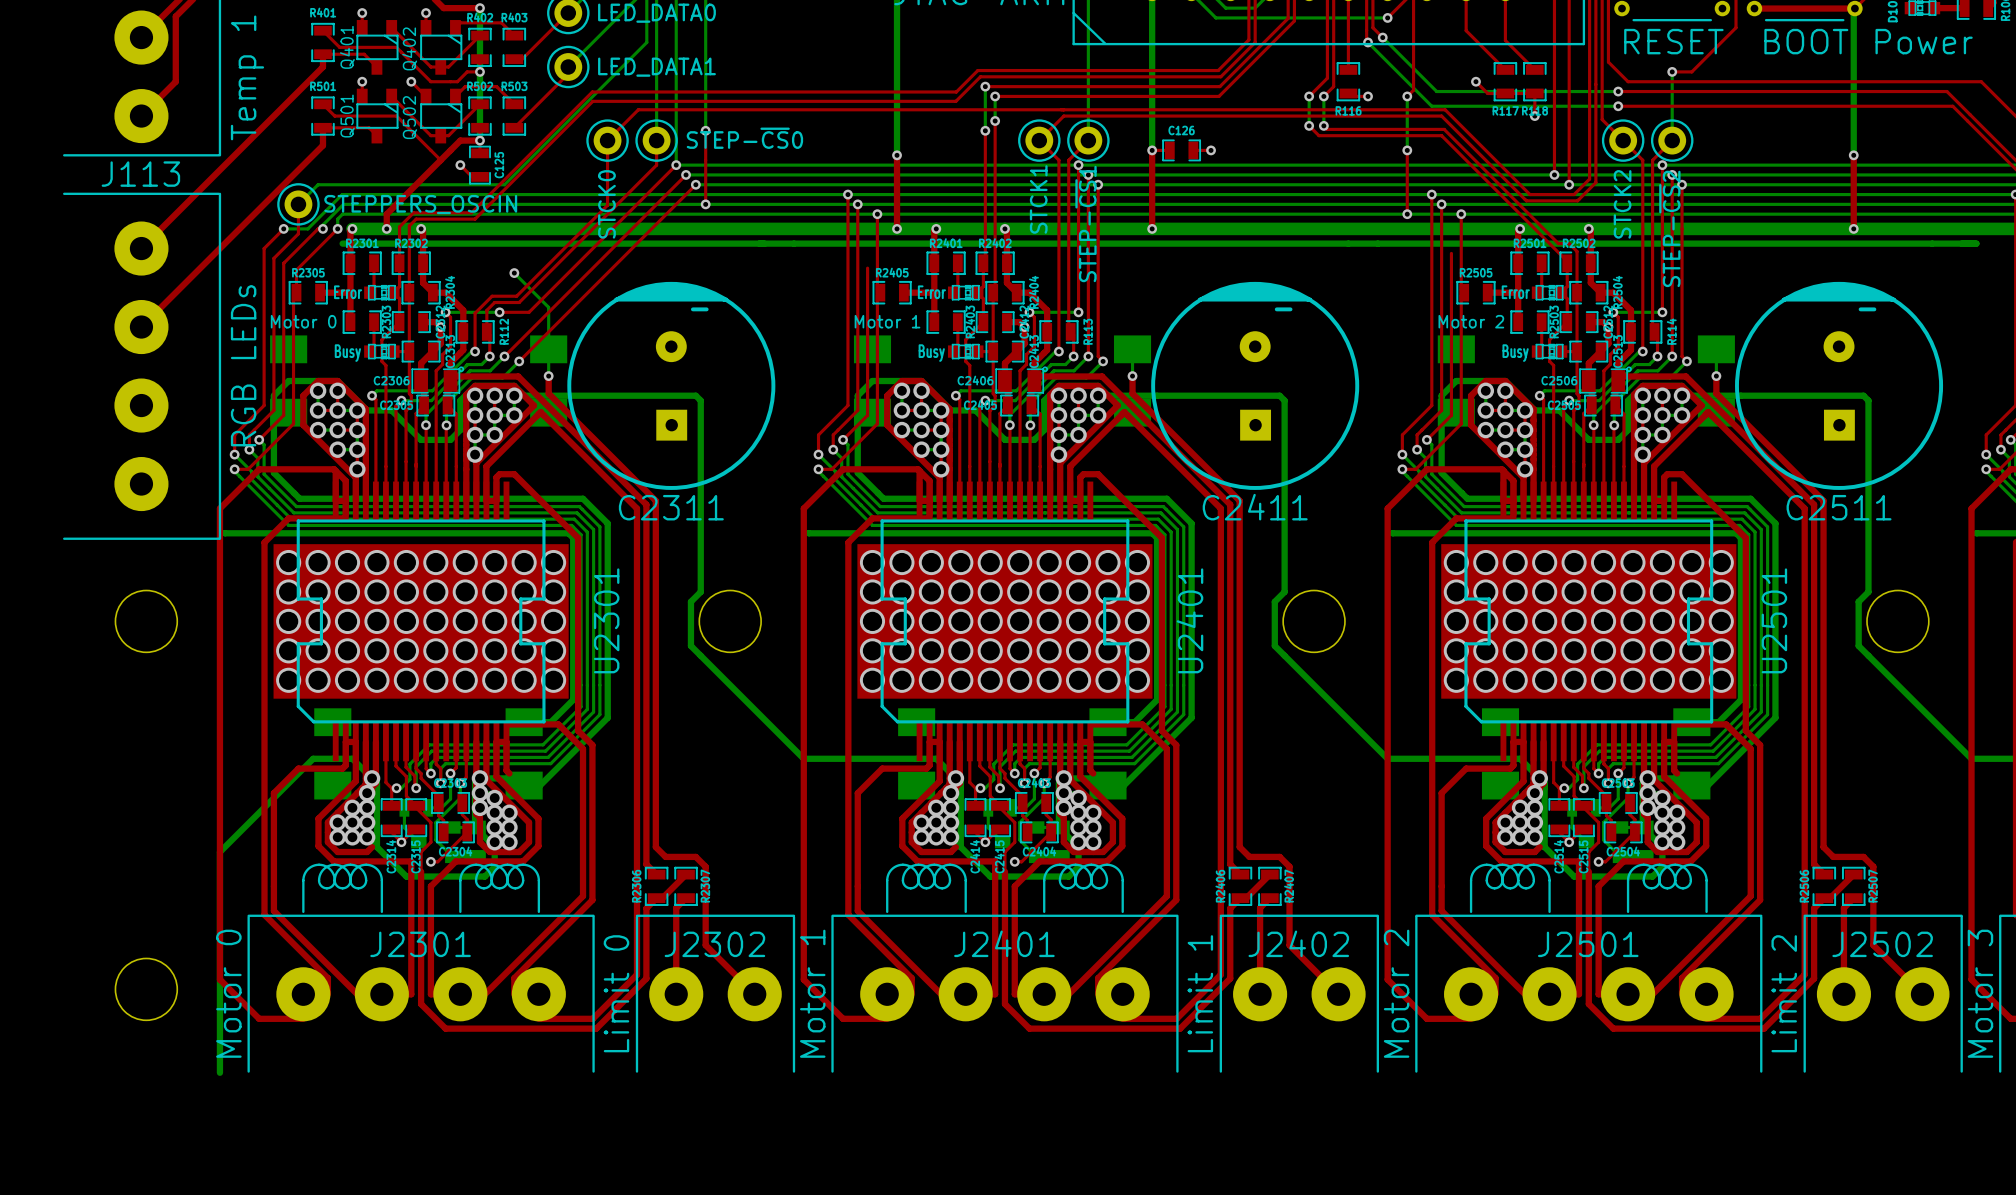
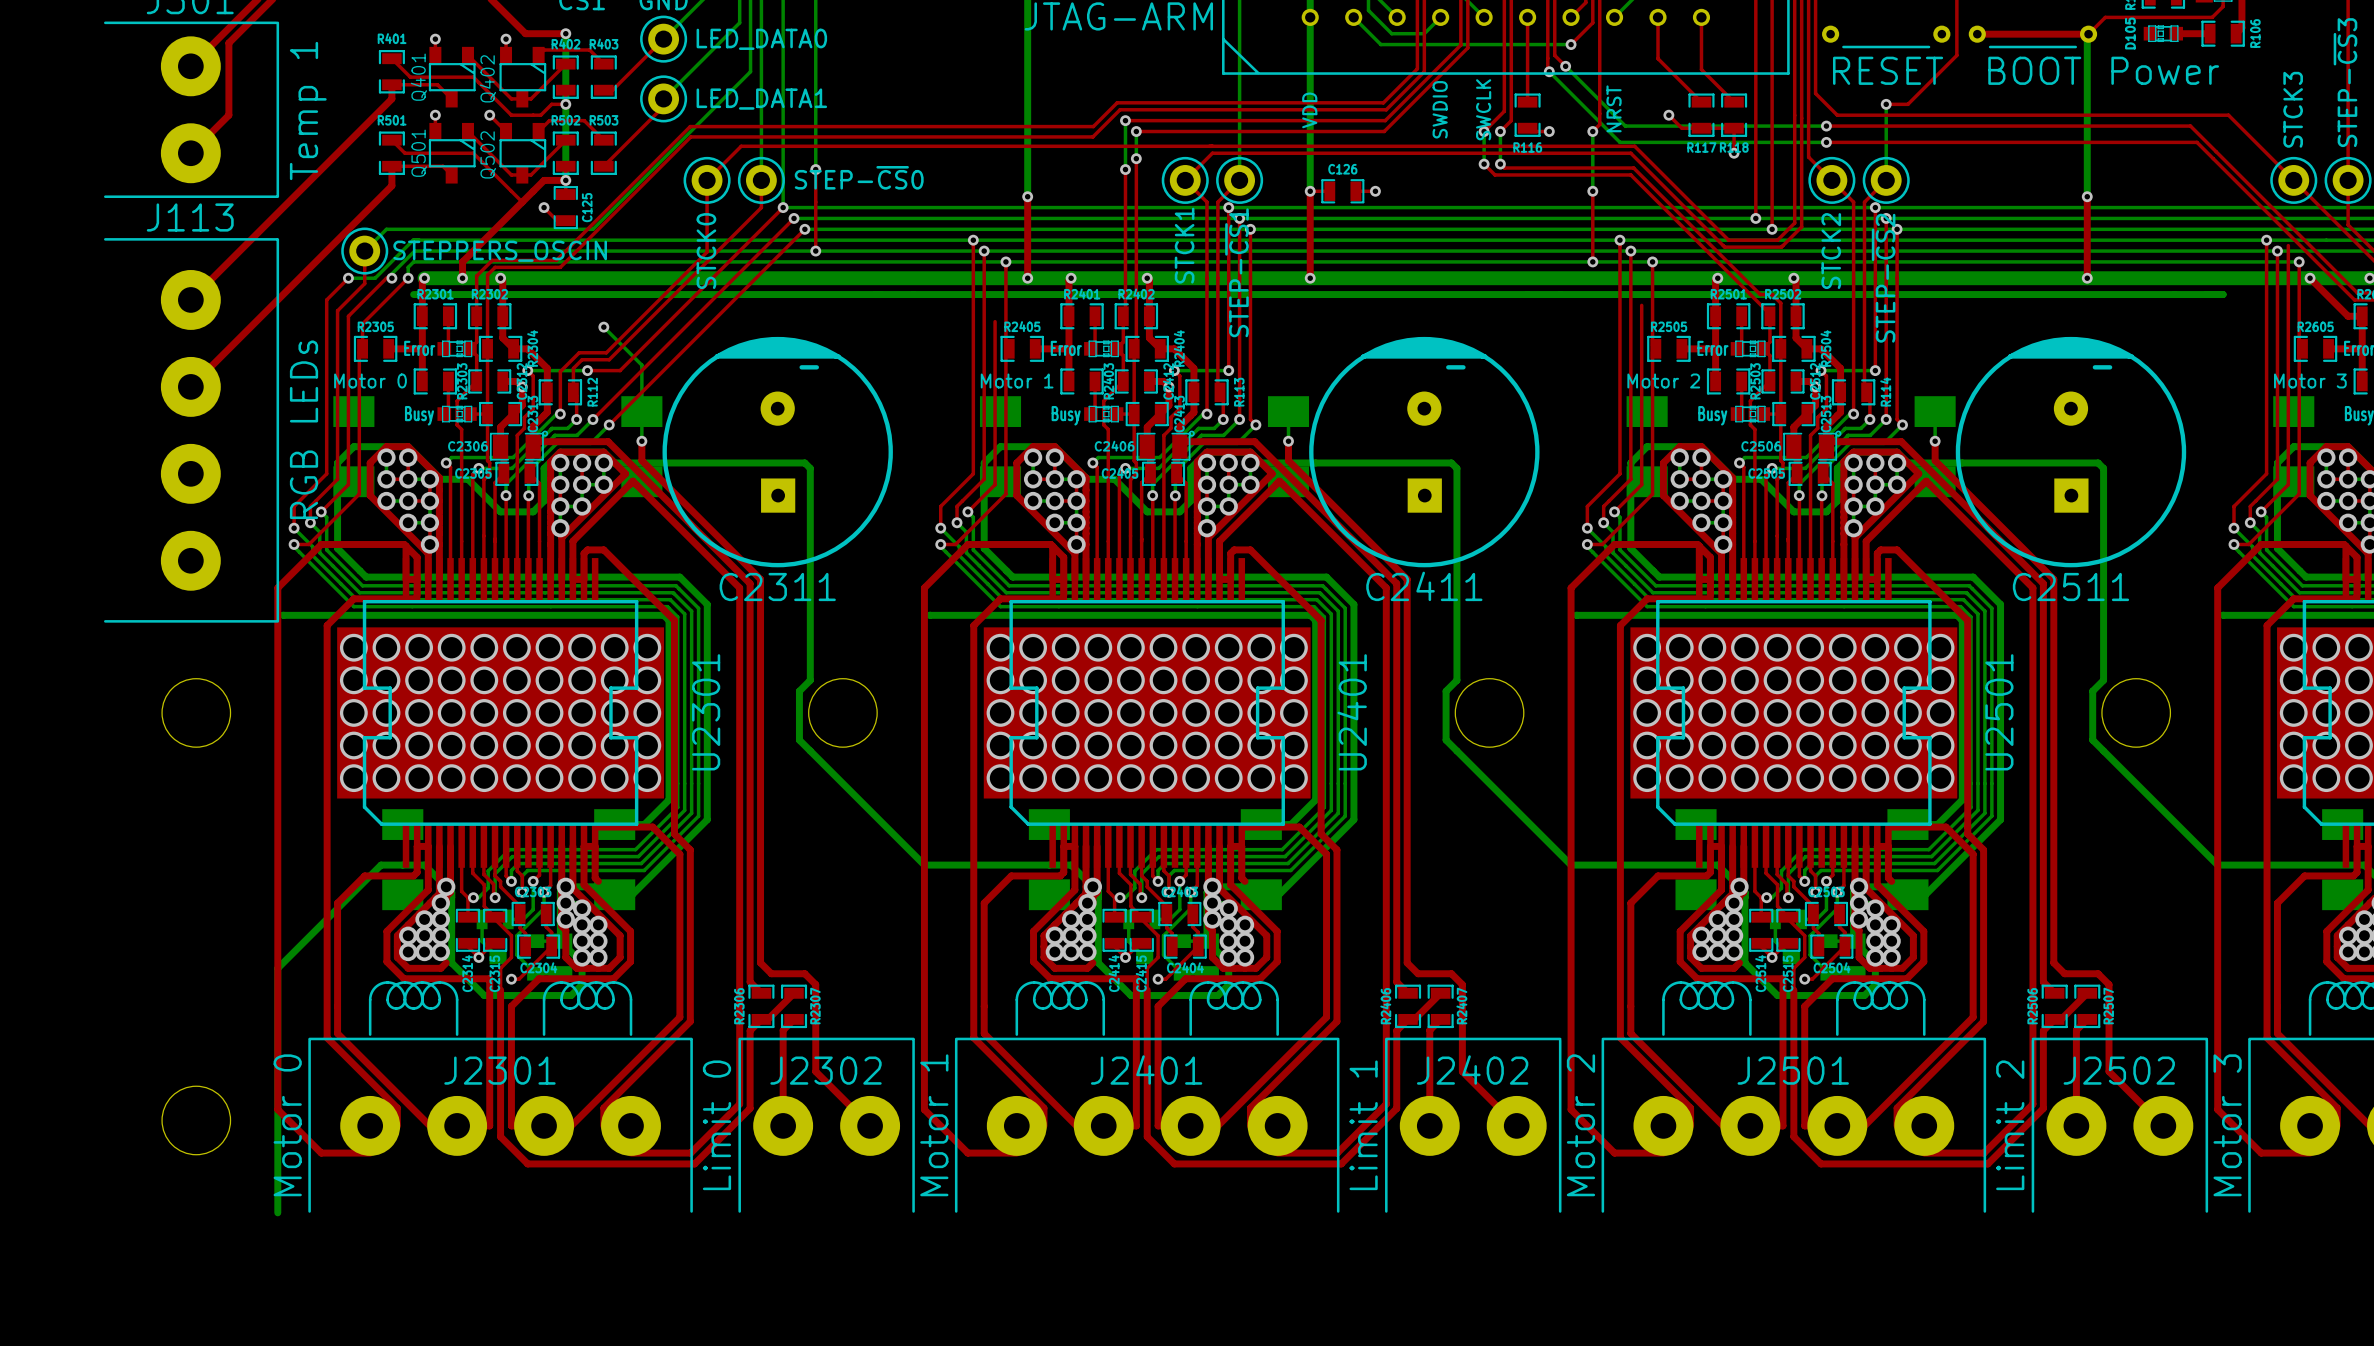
text: none -> NRST (1614, 108)
text: none -> SWDIO (1440, 109)
text: none -> SWCLK (1483, 109)
text: none -> VDD (1309, 110)

